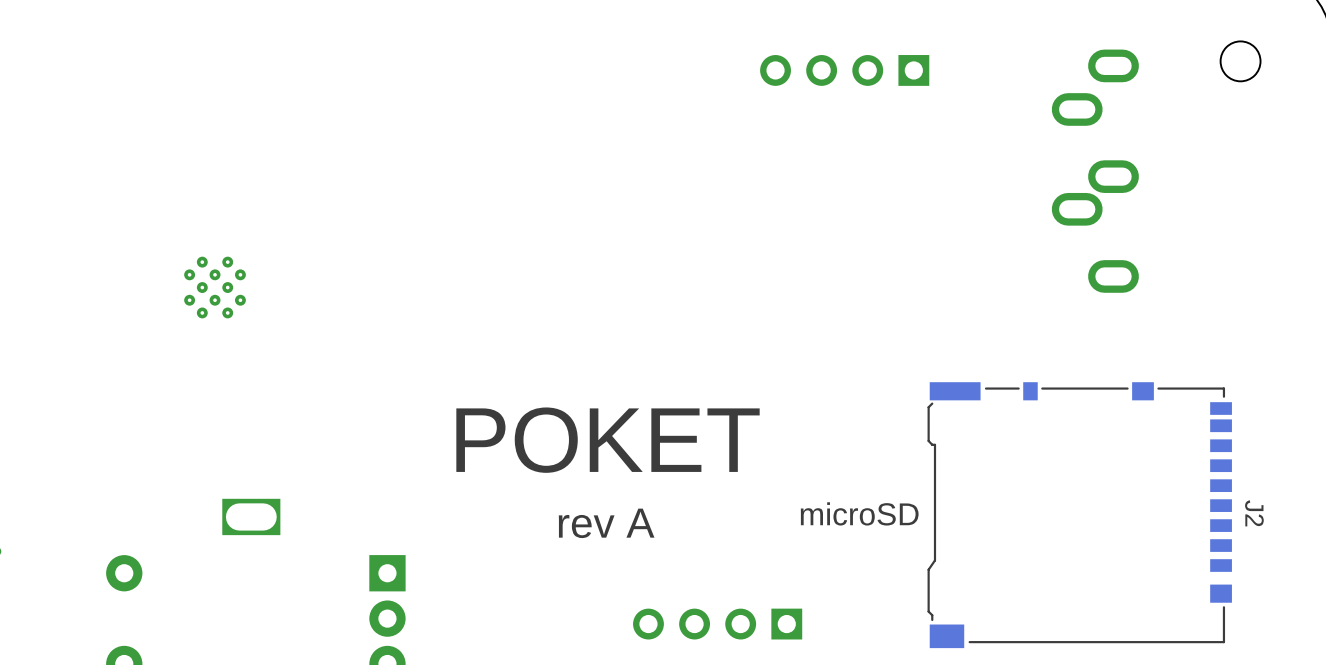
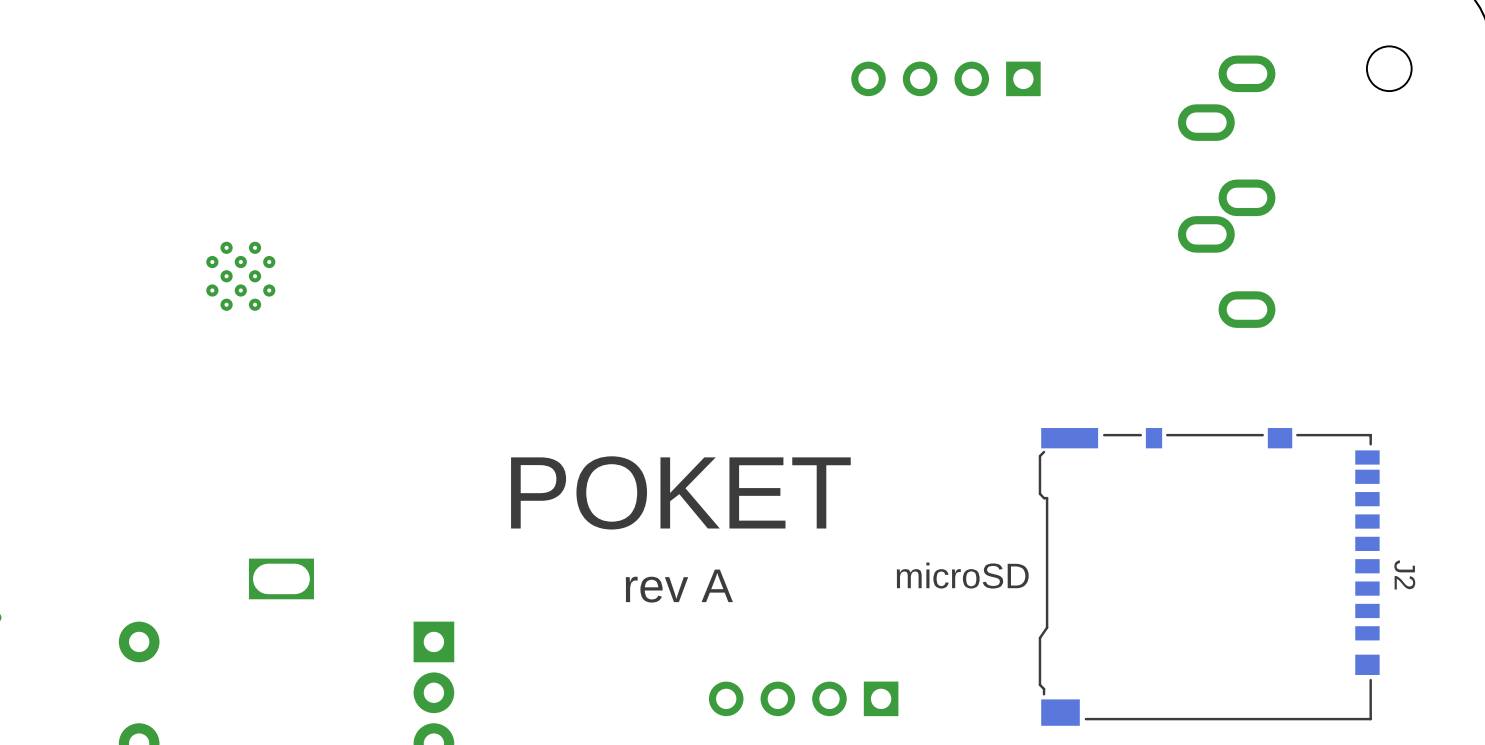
part position: (215, 287) -> (240, 276)

